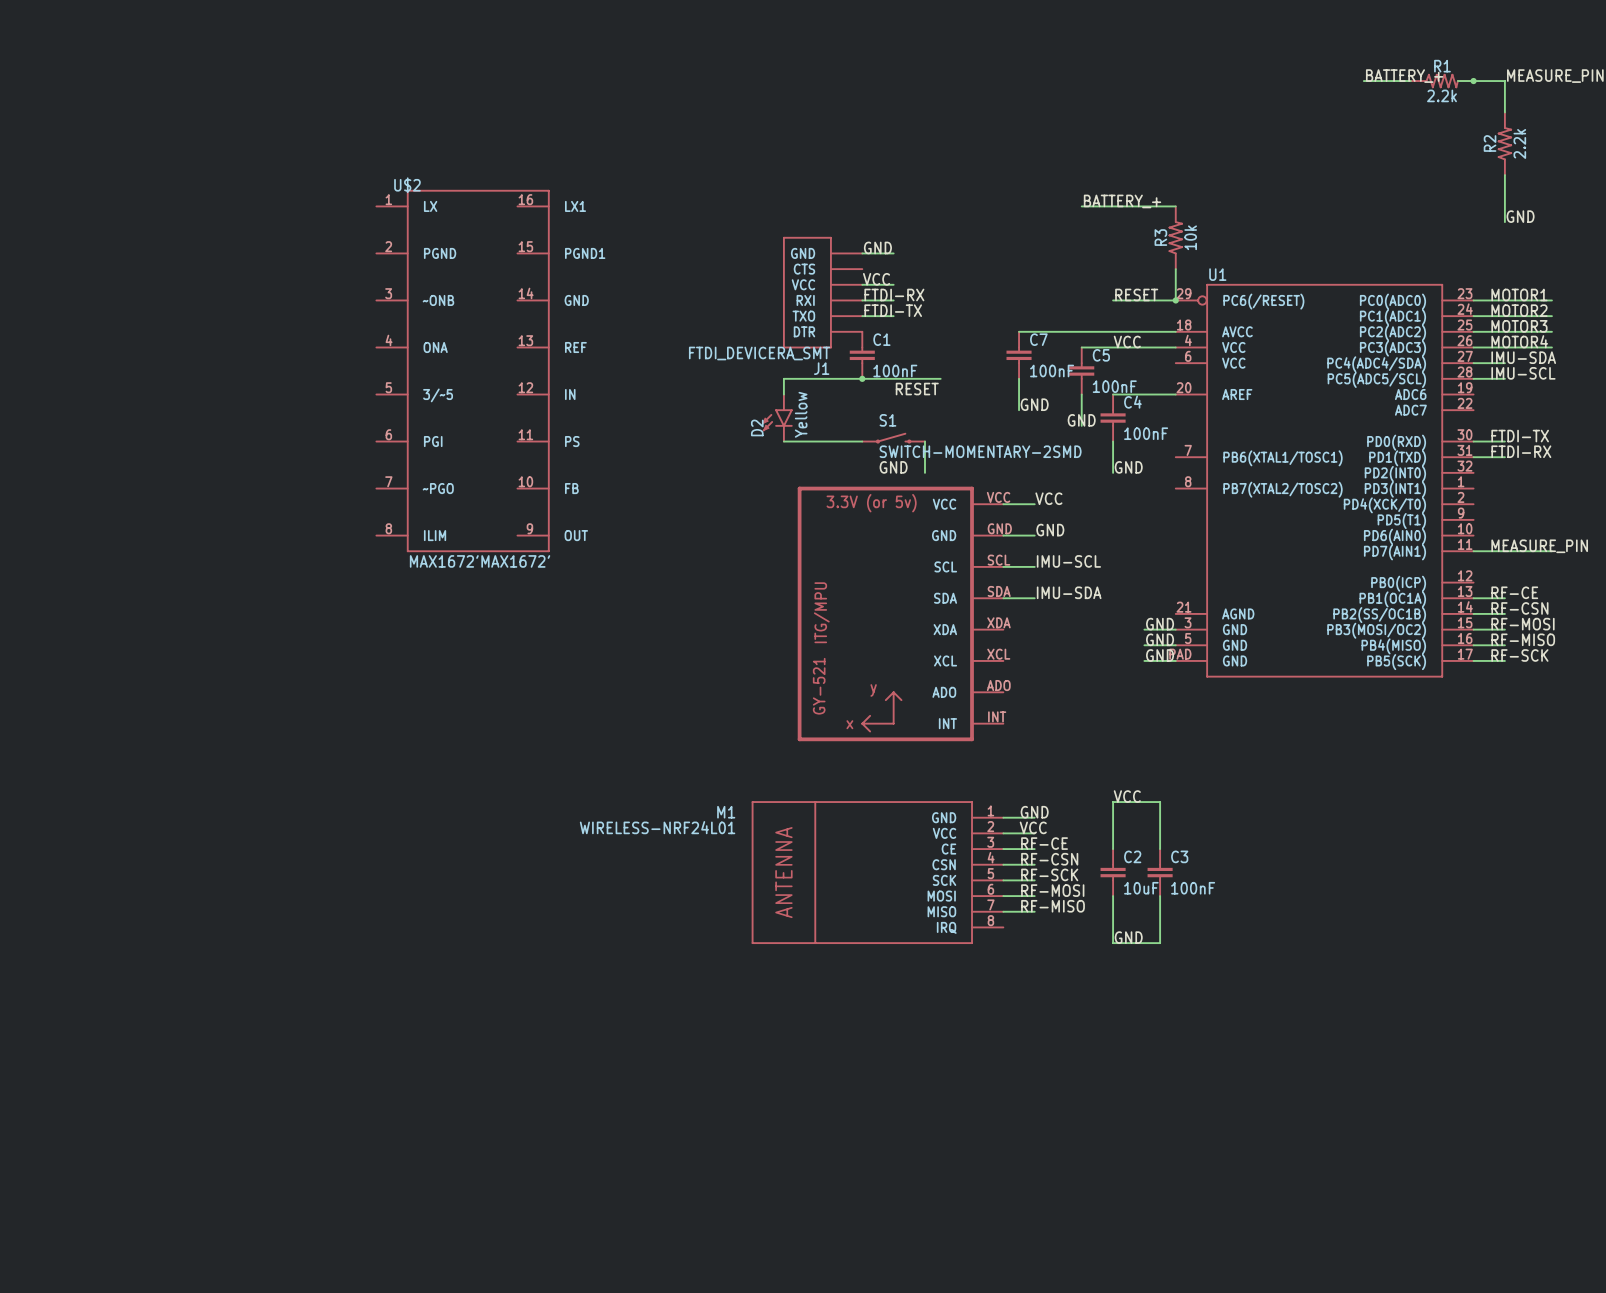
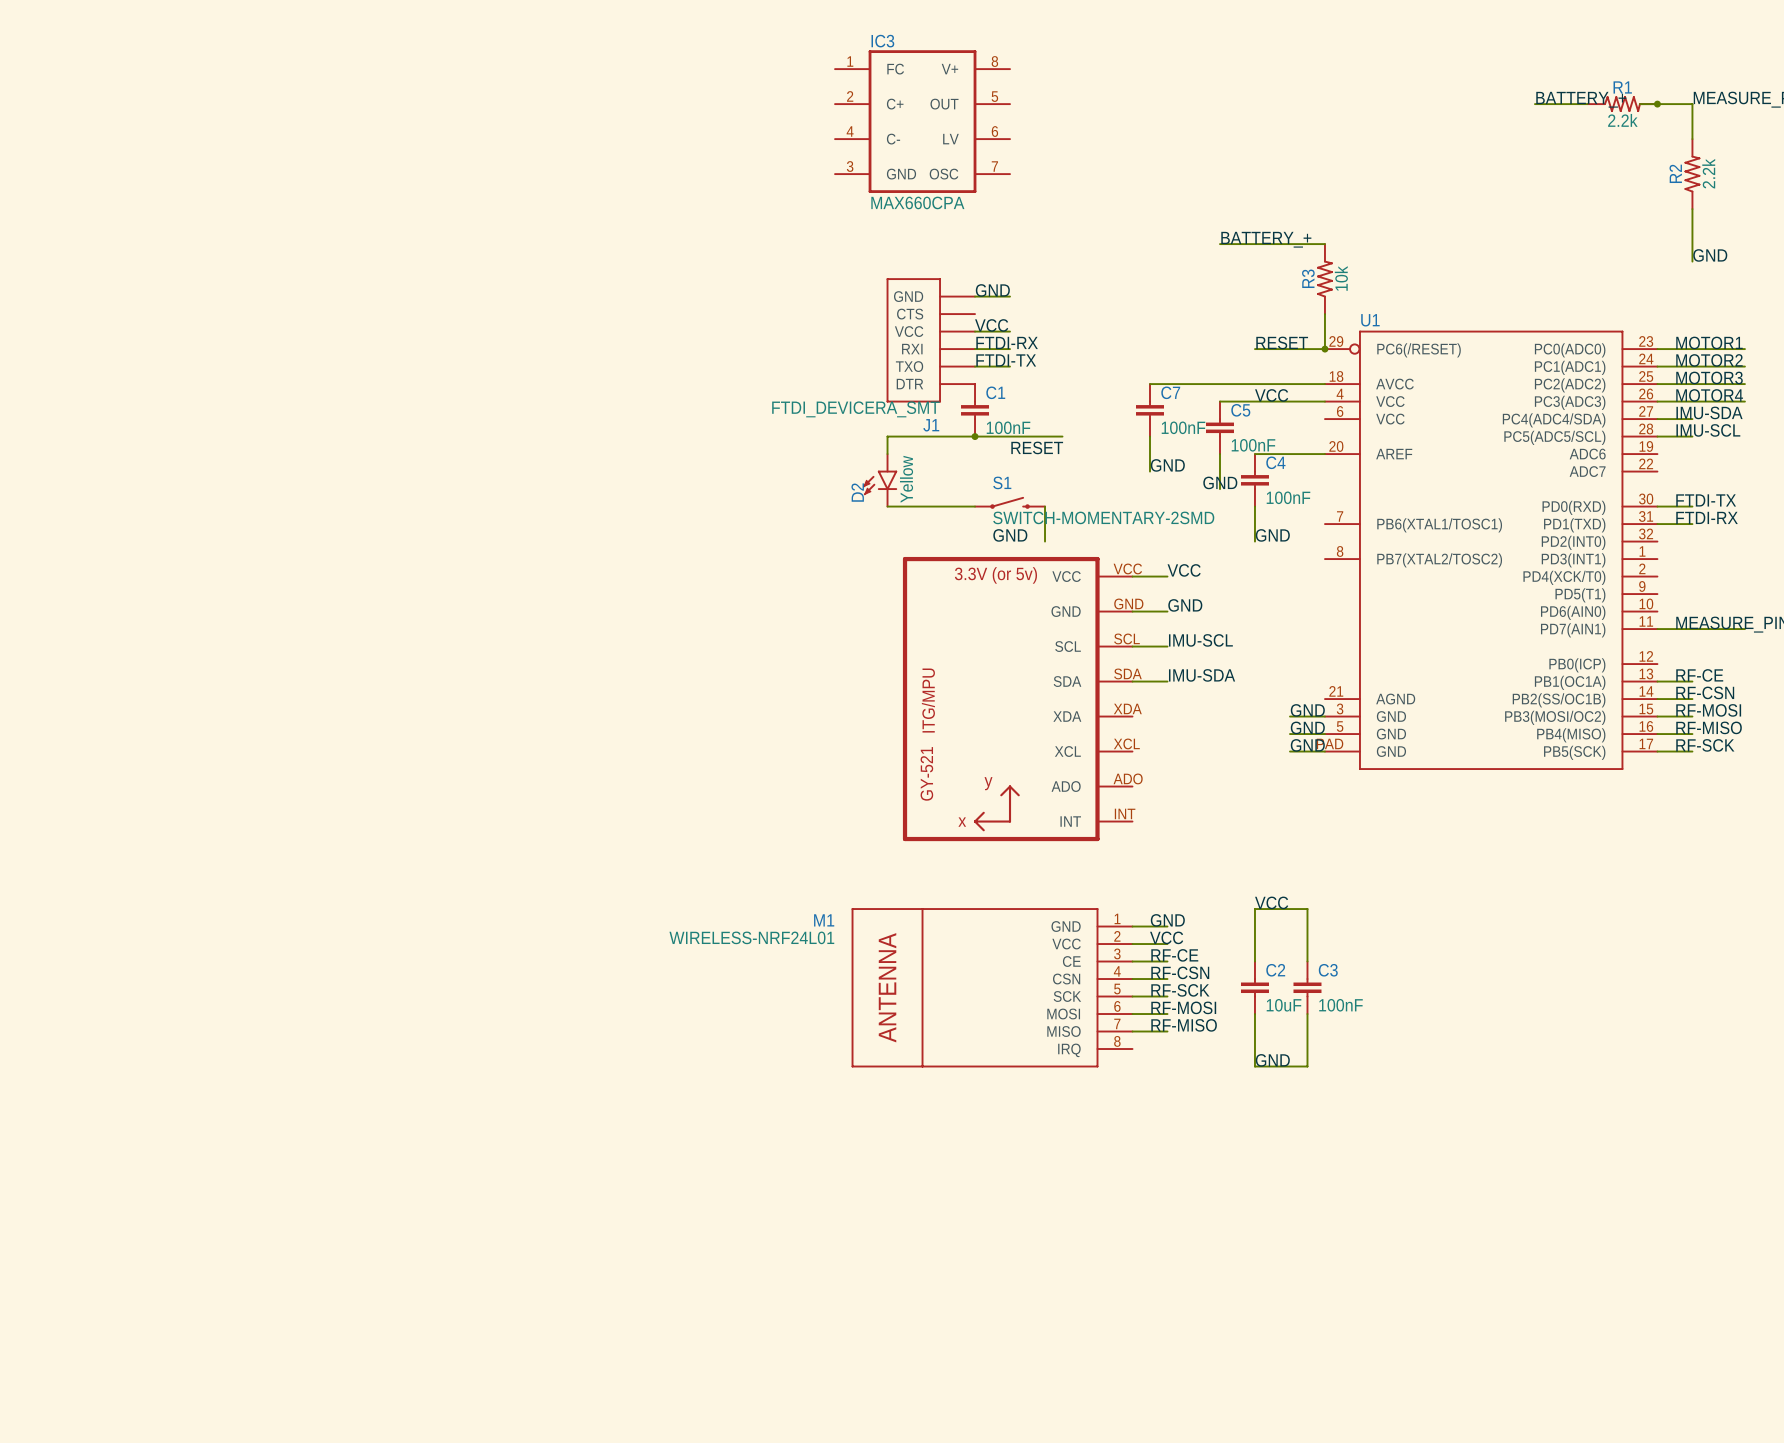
IC3: none -> MAX660CPA (922, 121)
U$2: MAX1672'MAX1672' (463, 371) -> none

